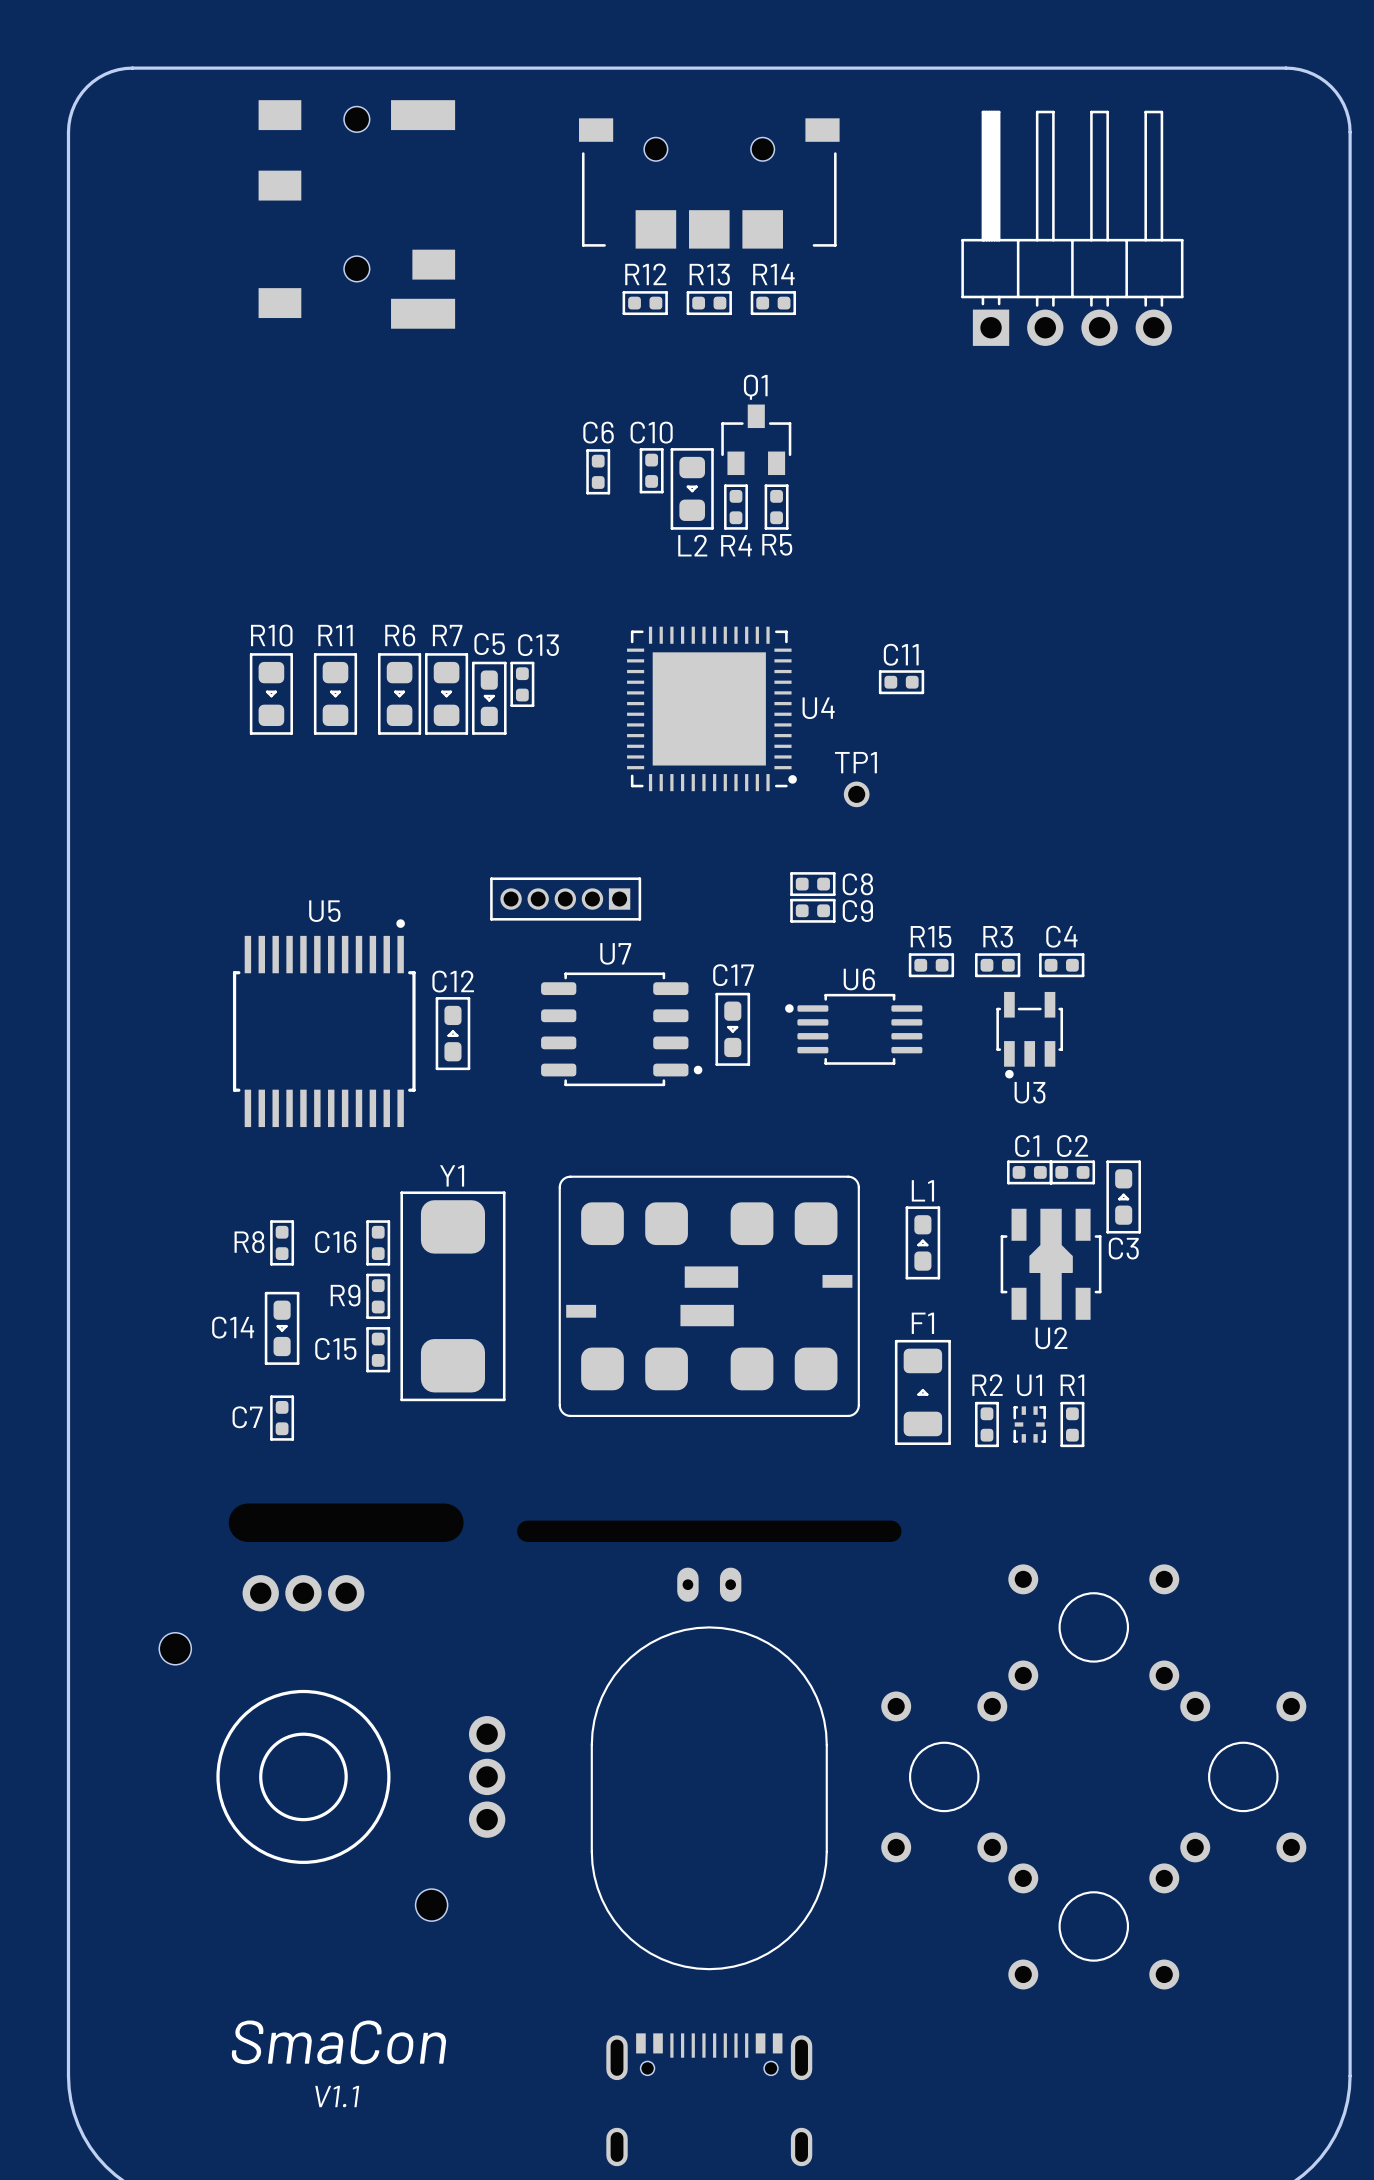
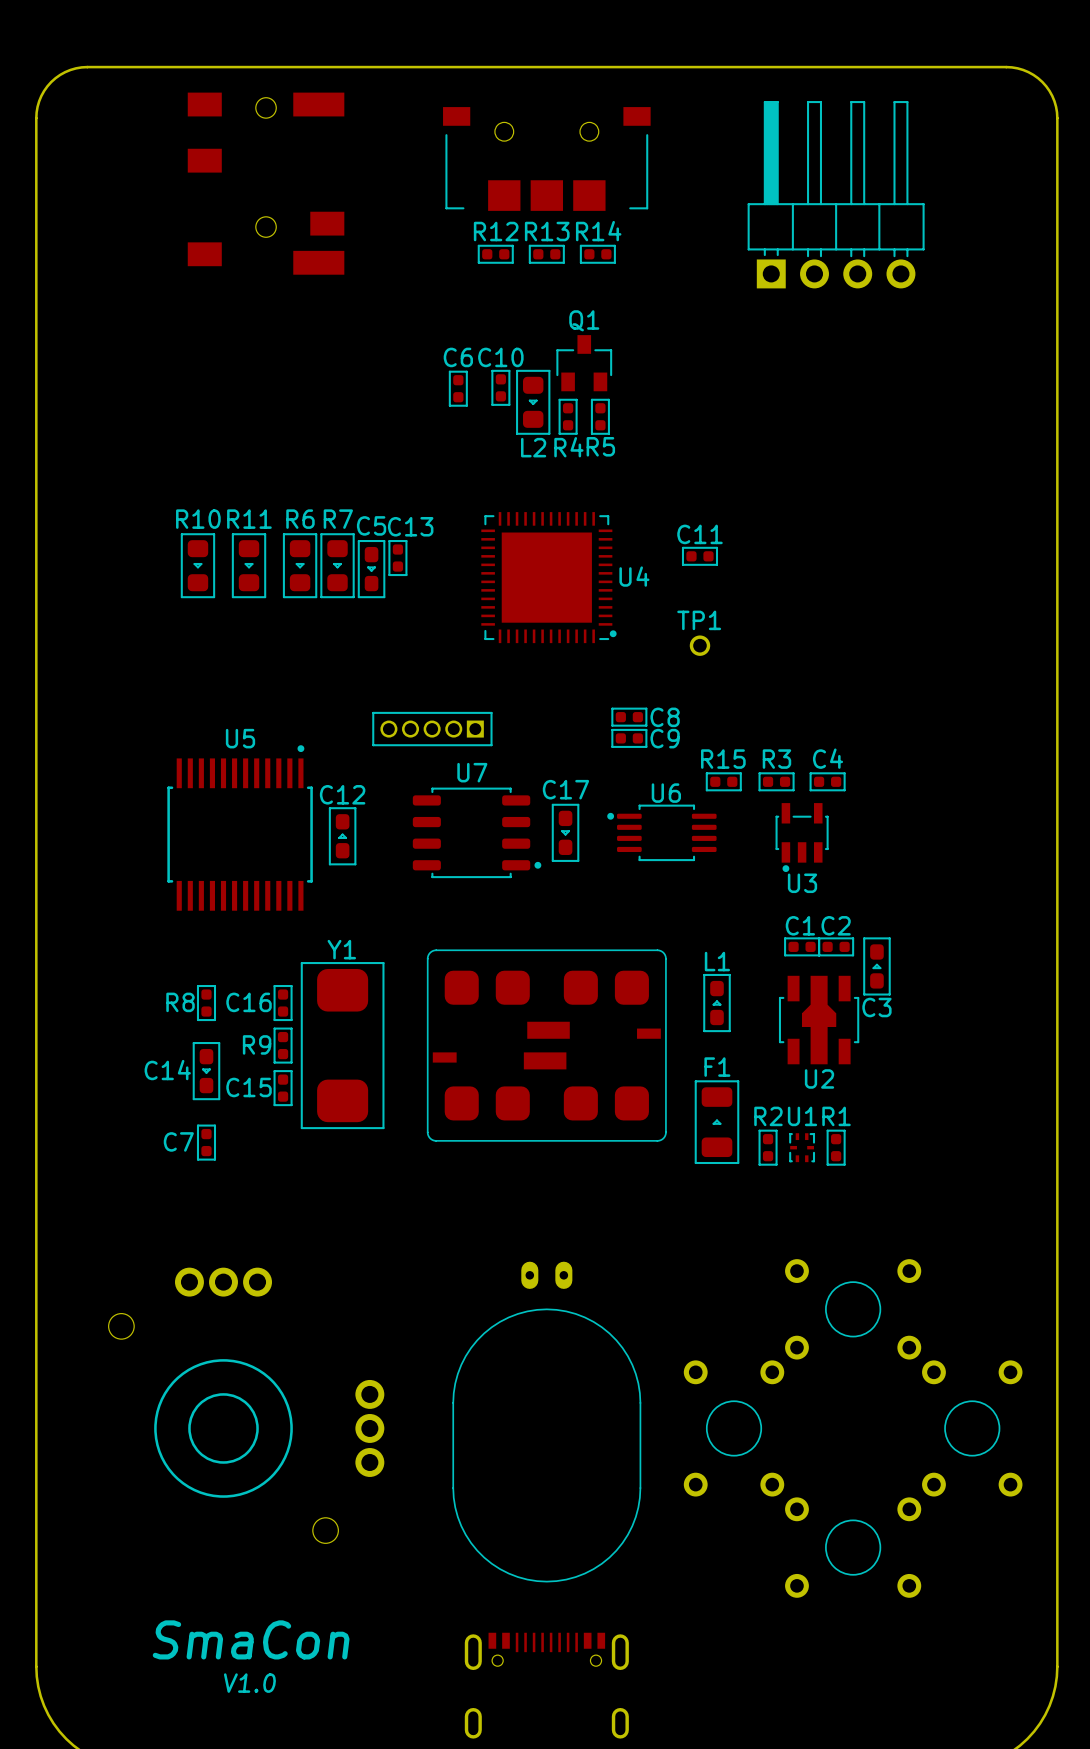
TP1 position: (856, 794) -> (699, 645)
text: V1.1 (337, 2096) -> V1.0 (249, 1683)

